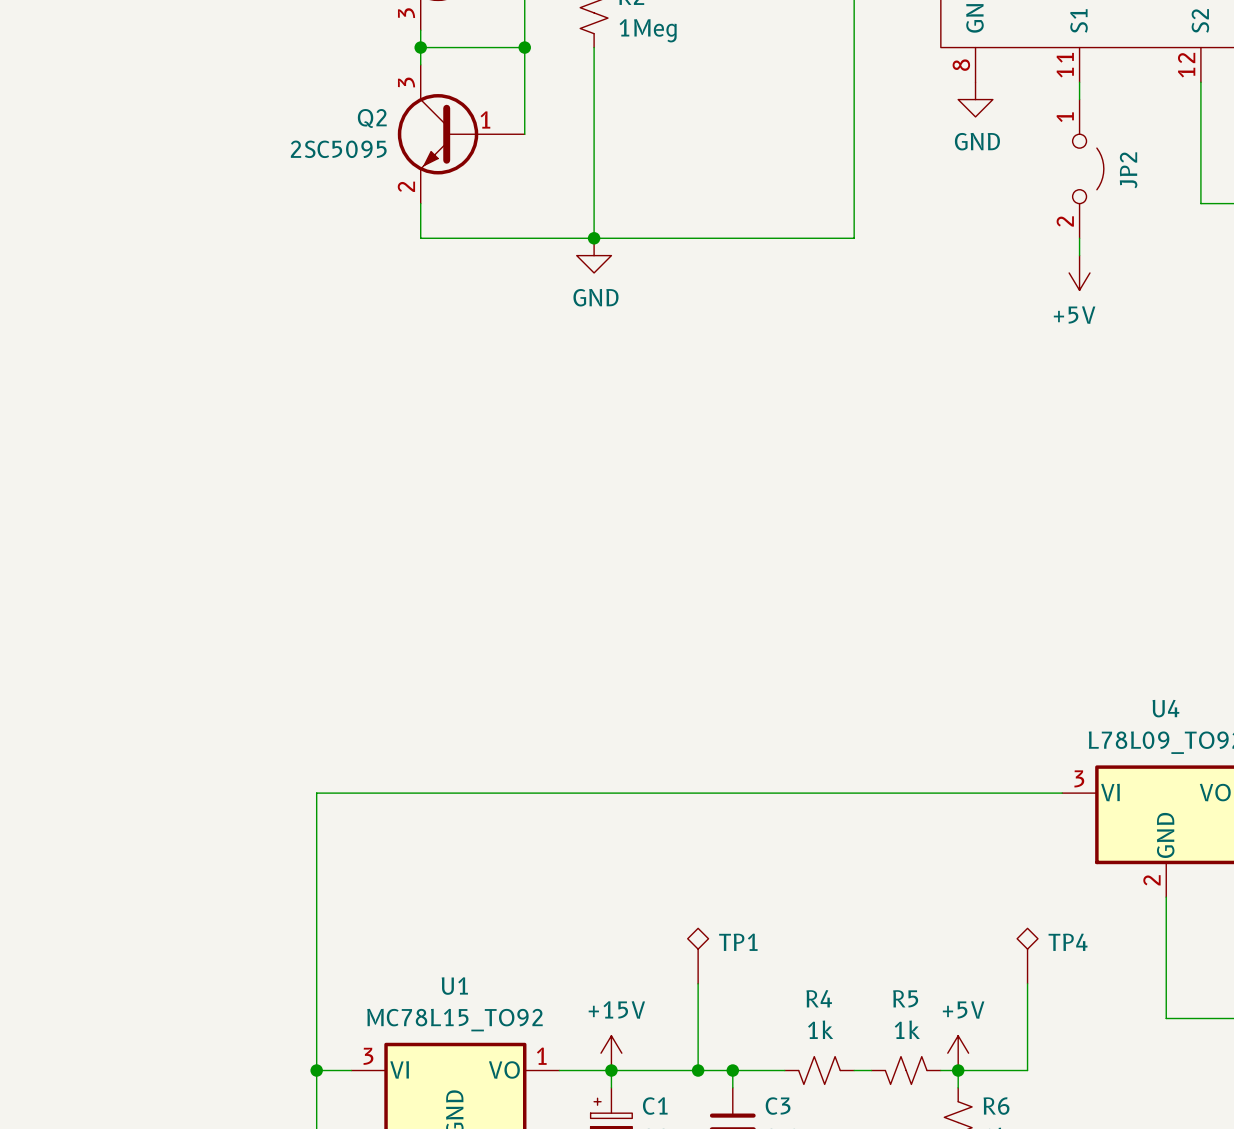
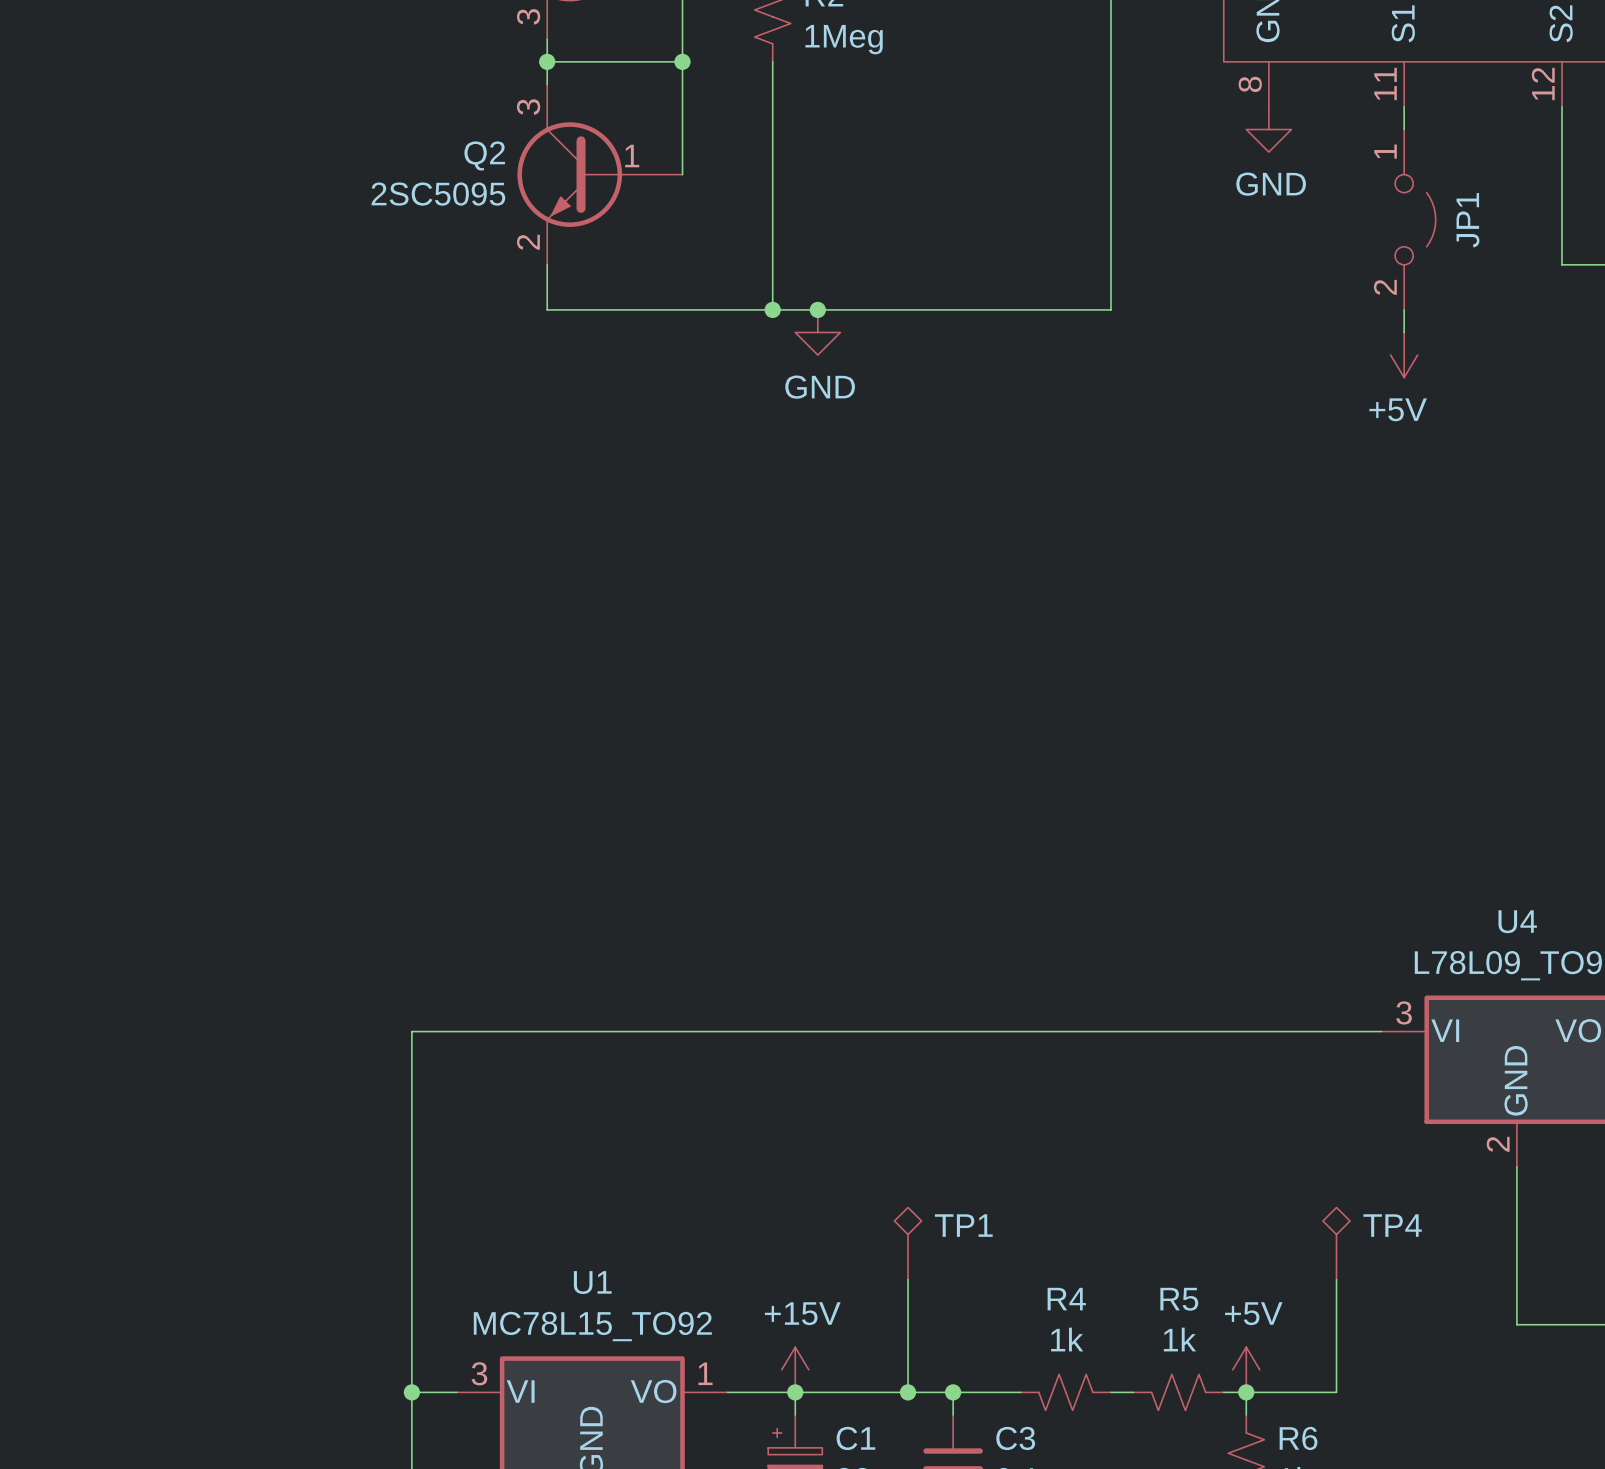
JP2 name: JP2 (1128, 170) -> JP1 (1467, 220)
junction: none -> (817, 309)
power symbol position: GND (594, 255) -> GND (817, 332)

